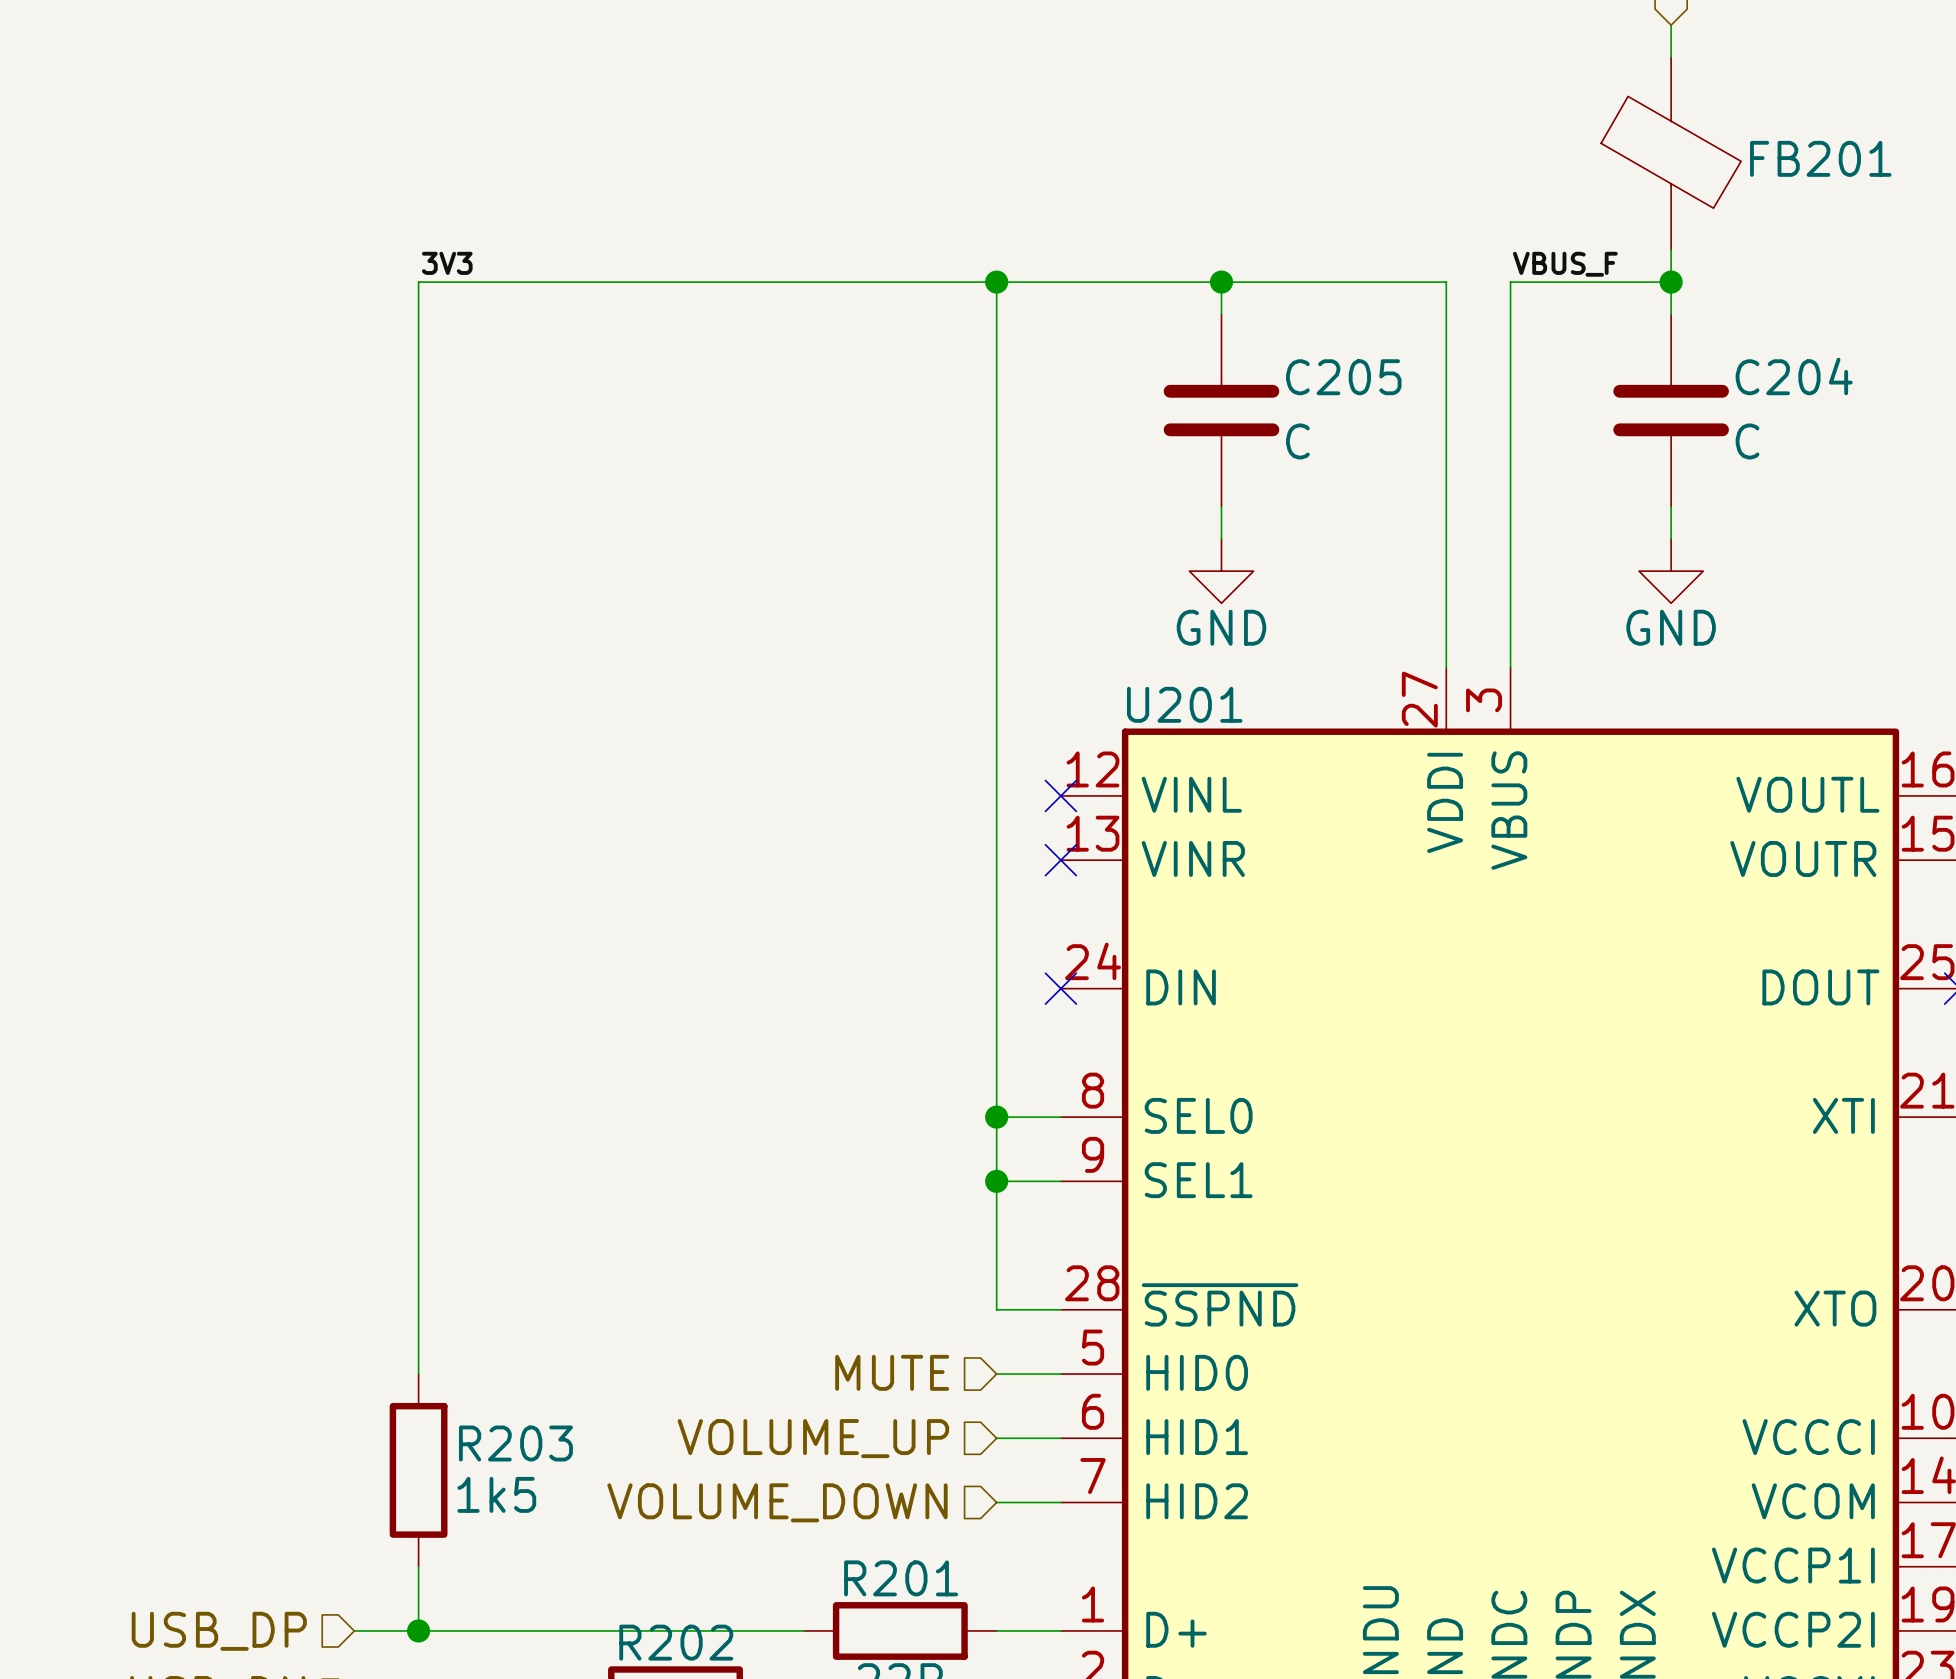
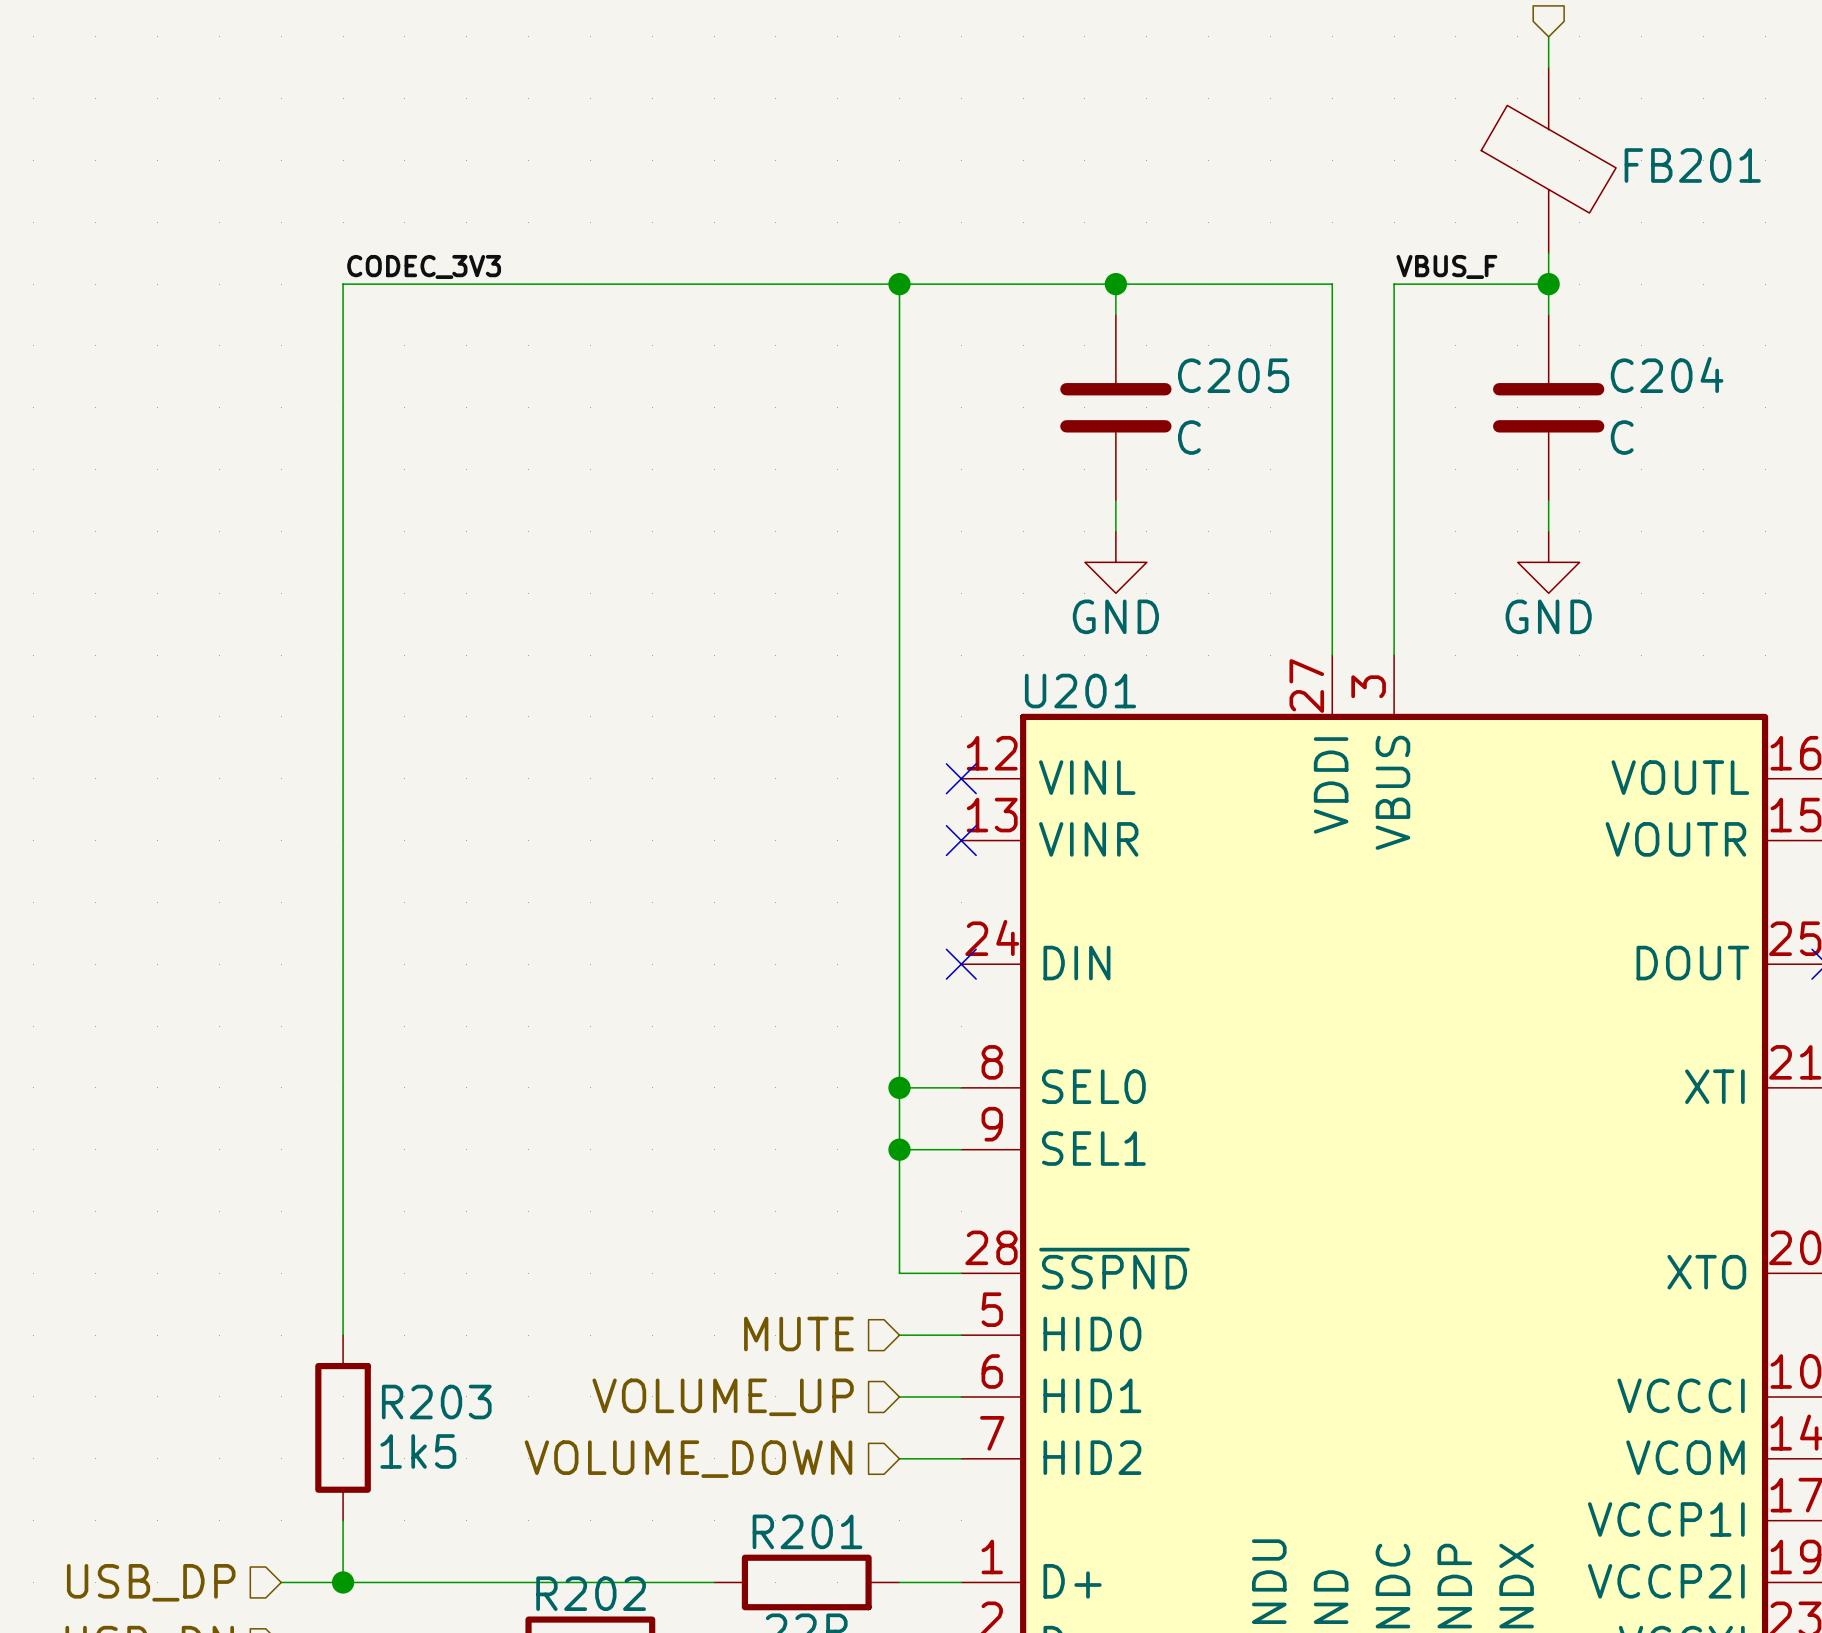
label: 3V3 (447, 263) -> CODEC_3V3 (424, 266)

